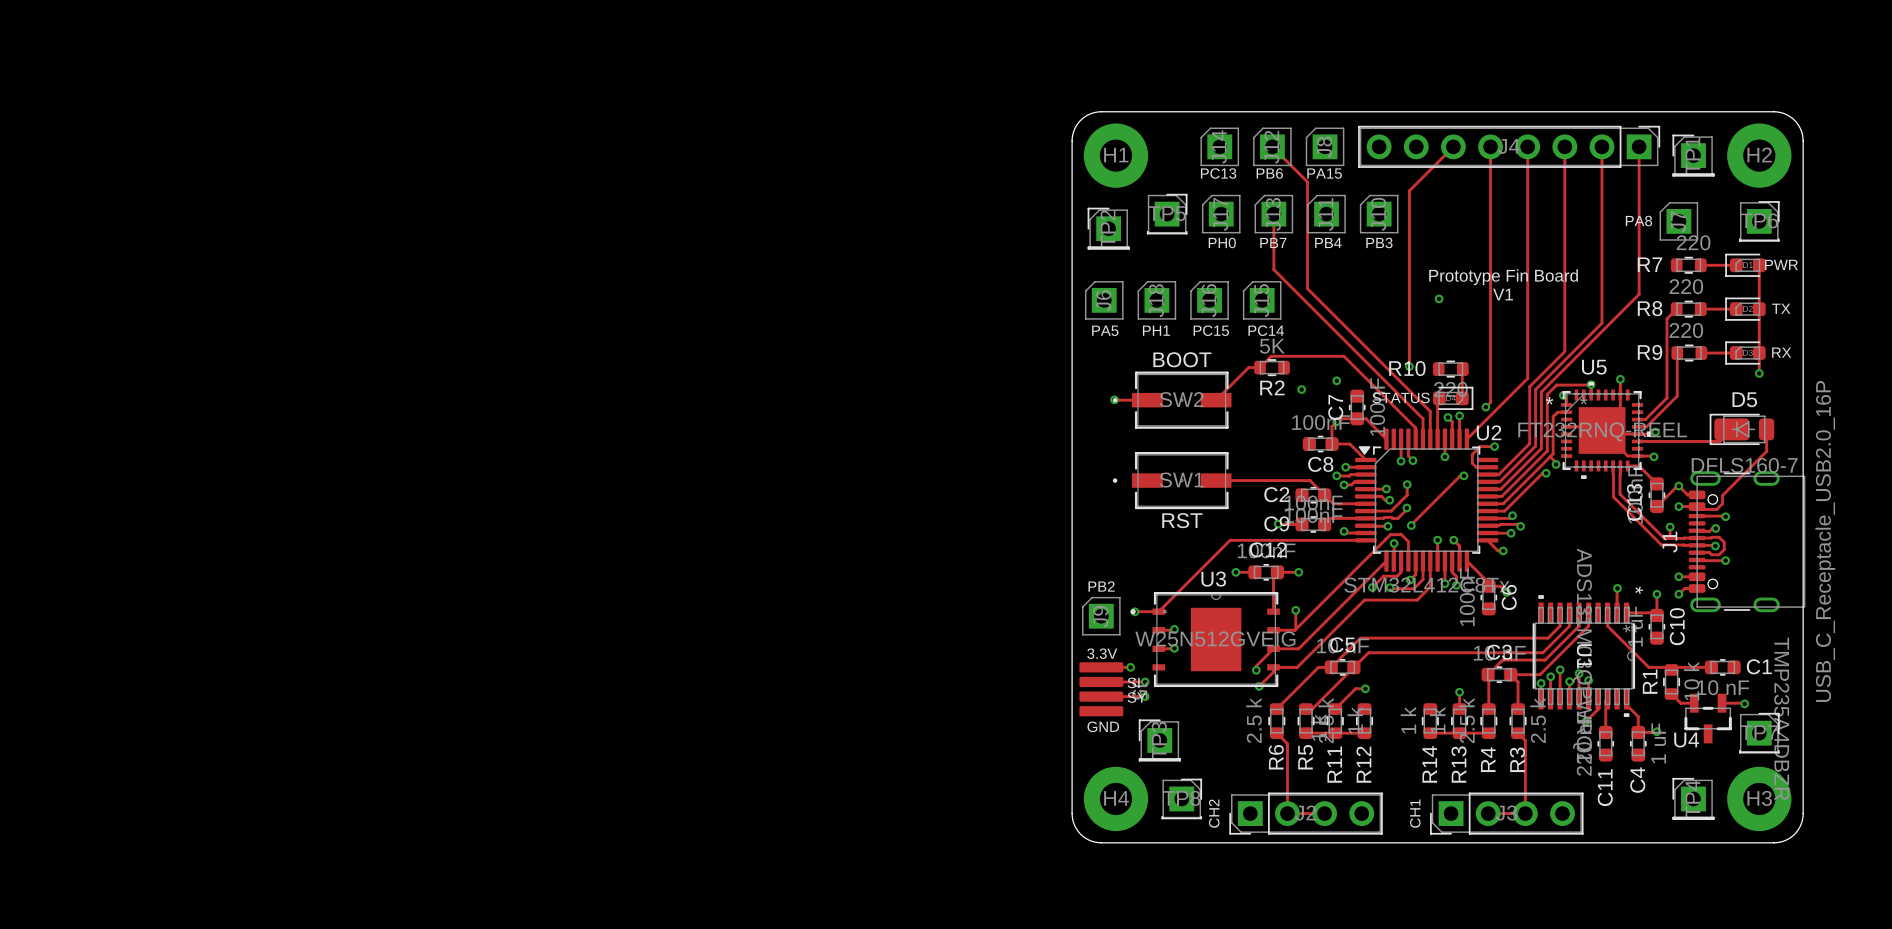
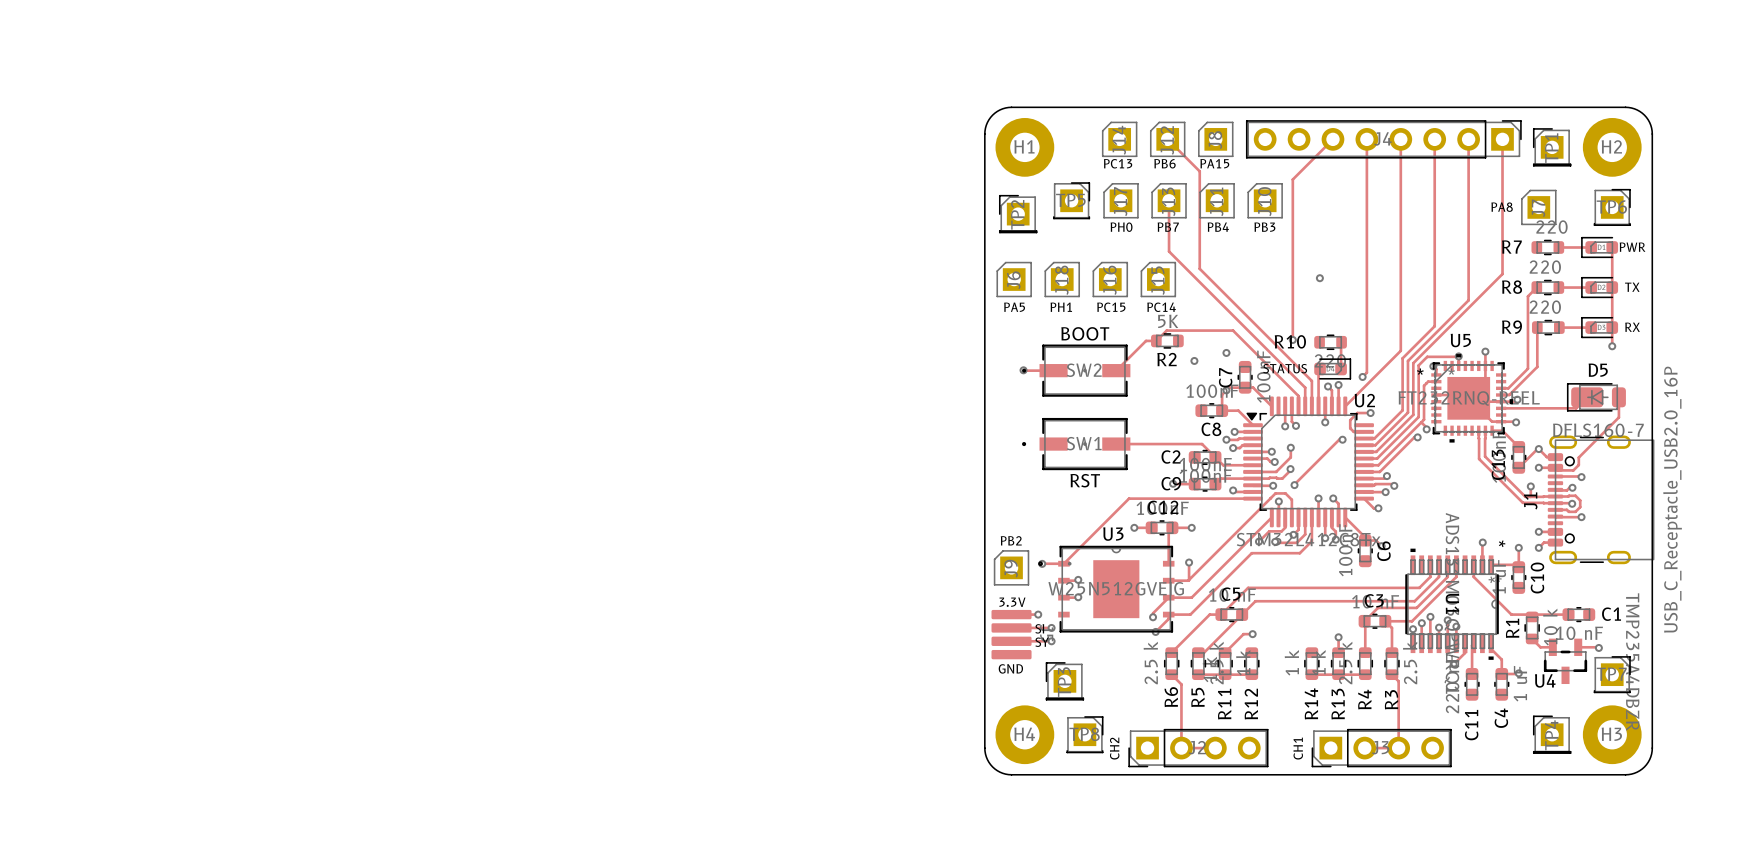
text: Prototype Fin Board (1503, 277) -> none
text: V1 (1503, 294) -> none

